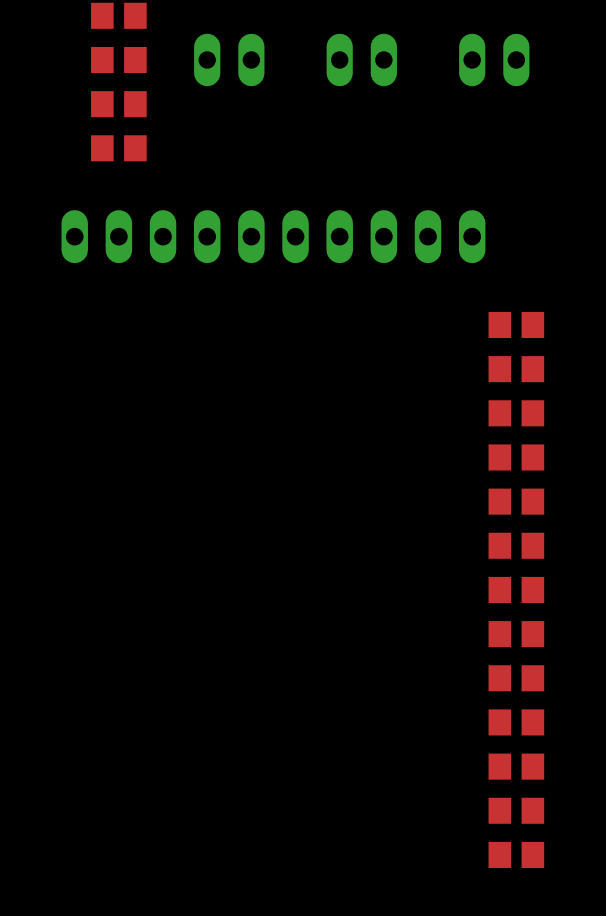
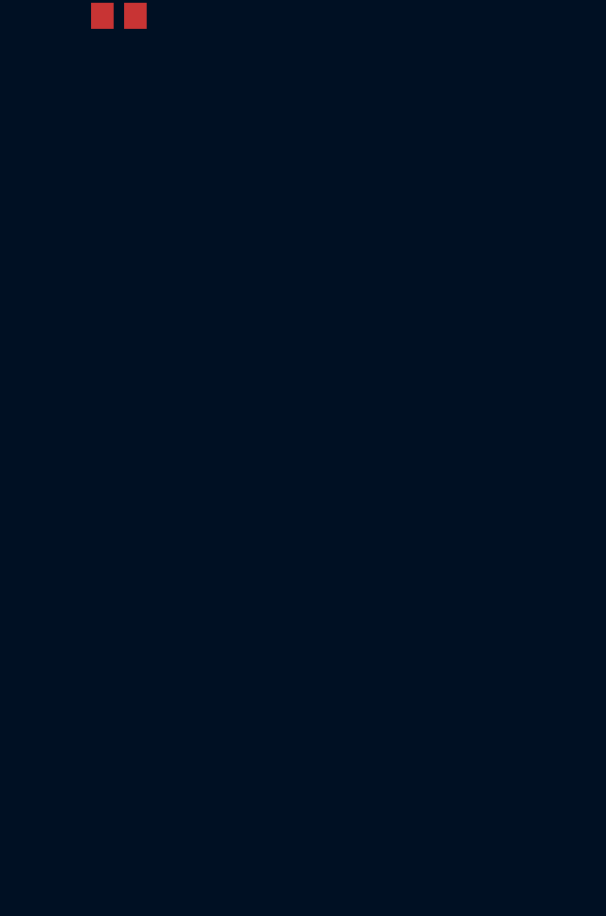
part: (118, 59) -> none
part: (229, 59) -> none
part: (361, 59) -> none
part: (494, 59) -> none
part: (118, 104) -> none
part: (118, 148) -> none
part: (273, 236) -> none
part: (516, 324) -> none
part: (516, 369) -> none
part: (516, 413) -> none
part: (516, 457) -> none
part: (516, 501) -> none
part: (516, 545) -> none
part: (516, 589) -> none
part: (516, 634) -> none
part: (516, 678) -> none
part: (516, 722) -> none
part: (516, 766) -> none
part: (516, 810) -> none
part: (516, 854) -> none

